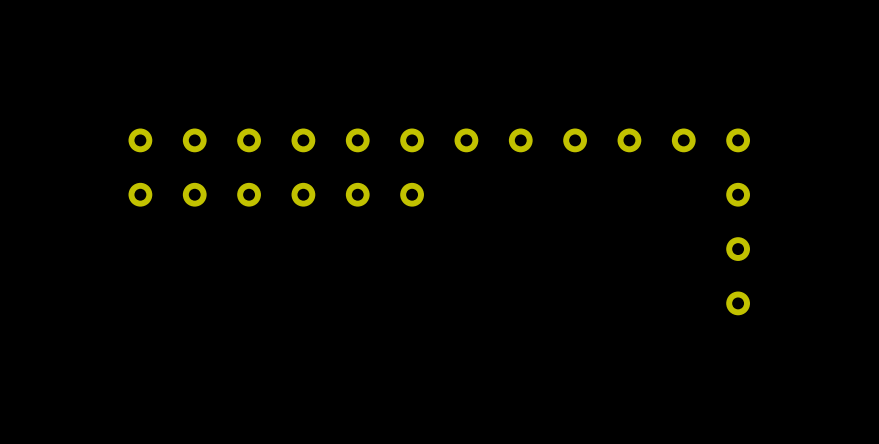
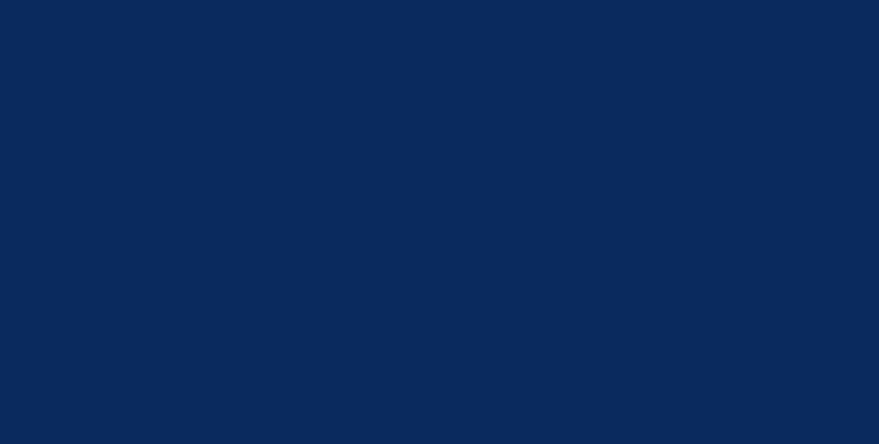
part: (140, 140) -> none
part: (194, 140) -> none
part: (249, 140) -> none
part: (303, 140) -> none
part: (357, 140) -> none
part: (412, 140) -> none
part: (466, 140) -> none
part: (520, 140) -> none
part: (575, 140) -> none
part: (629, 140) -> none
part: (683, 140) -> none
part: (738, 140) -> none
part: (140, 194) -> none
part: (194, 194) -> none
part: (249, 194) -> none
part: (303, 194) -> none
part: (357, 194) -> none
part: (412, 194) -> none
part: (738, 194) -> none
part: (738, 249) -> none
part: (738, 303) -> none

